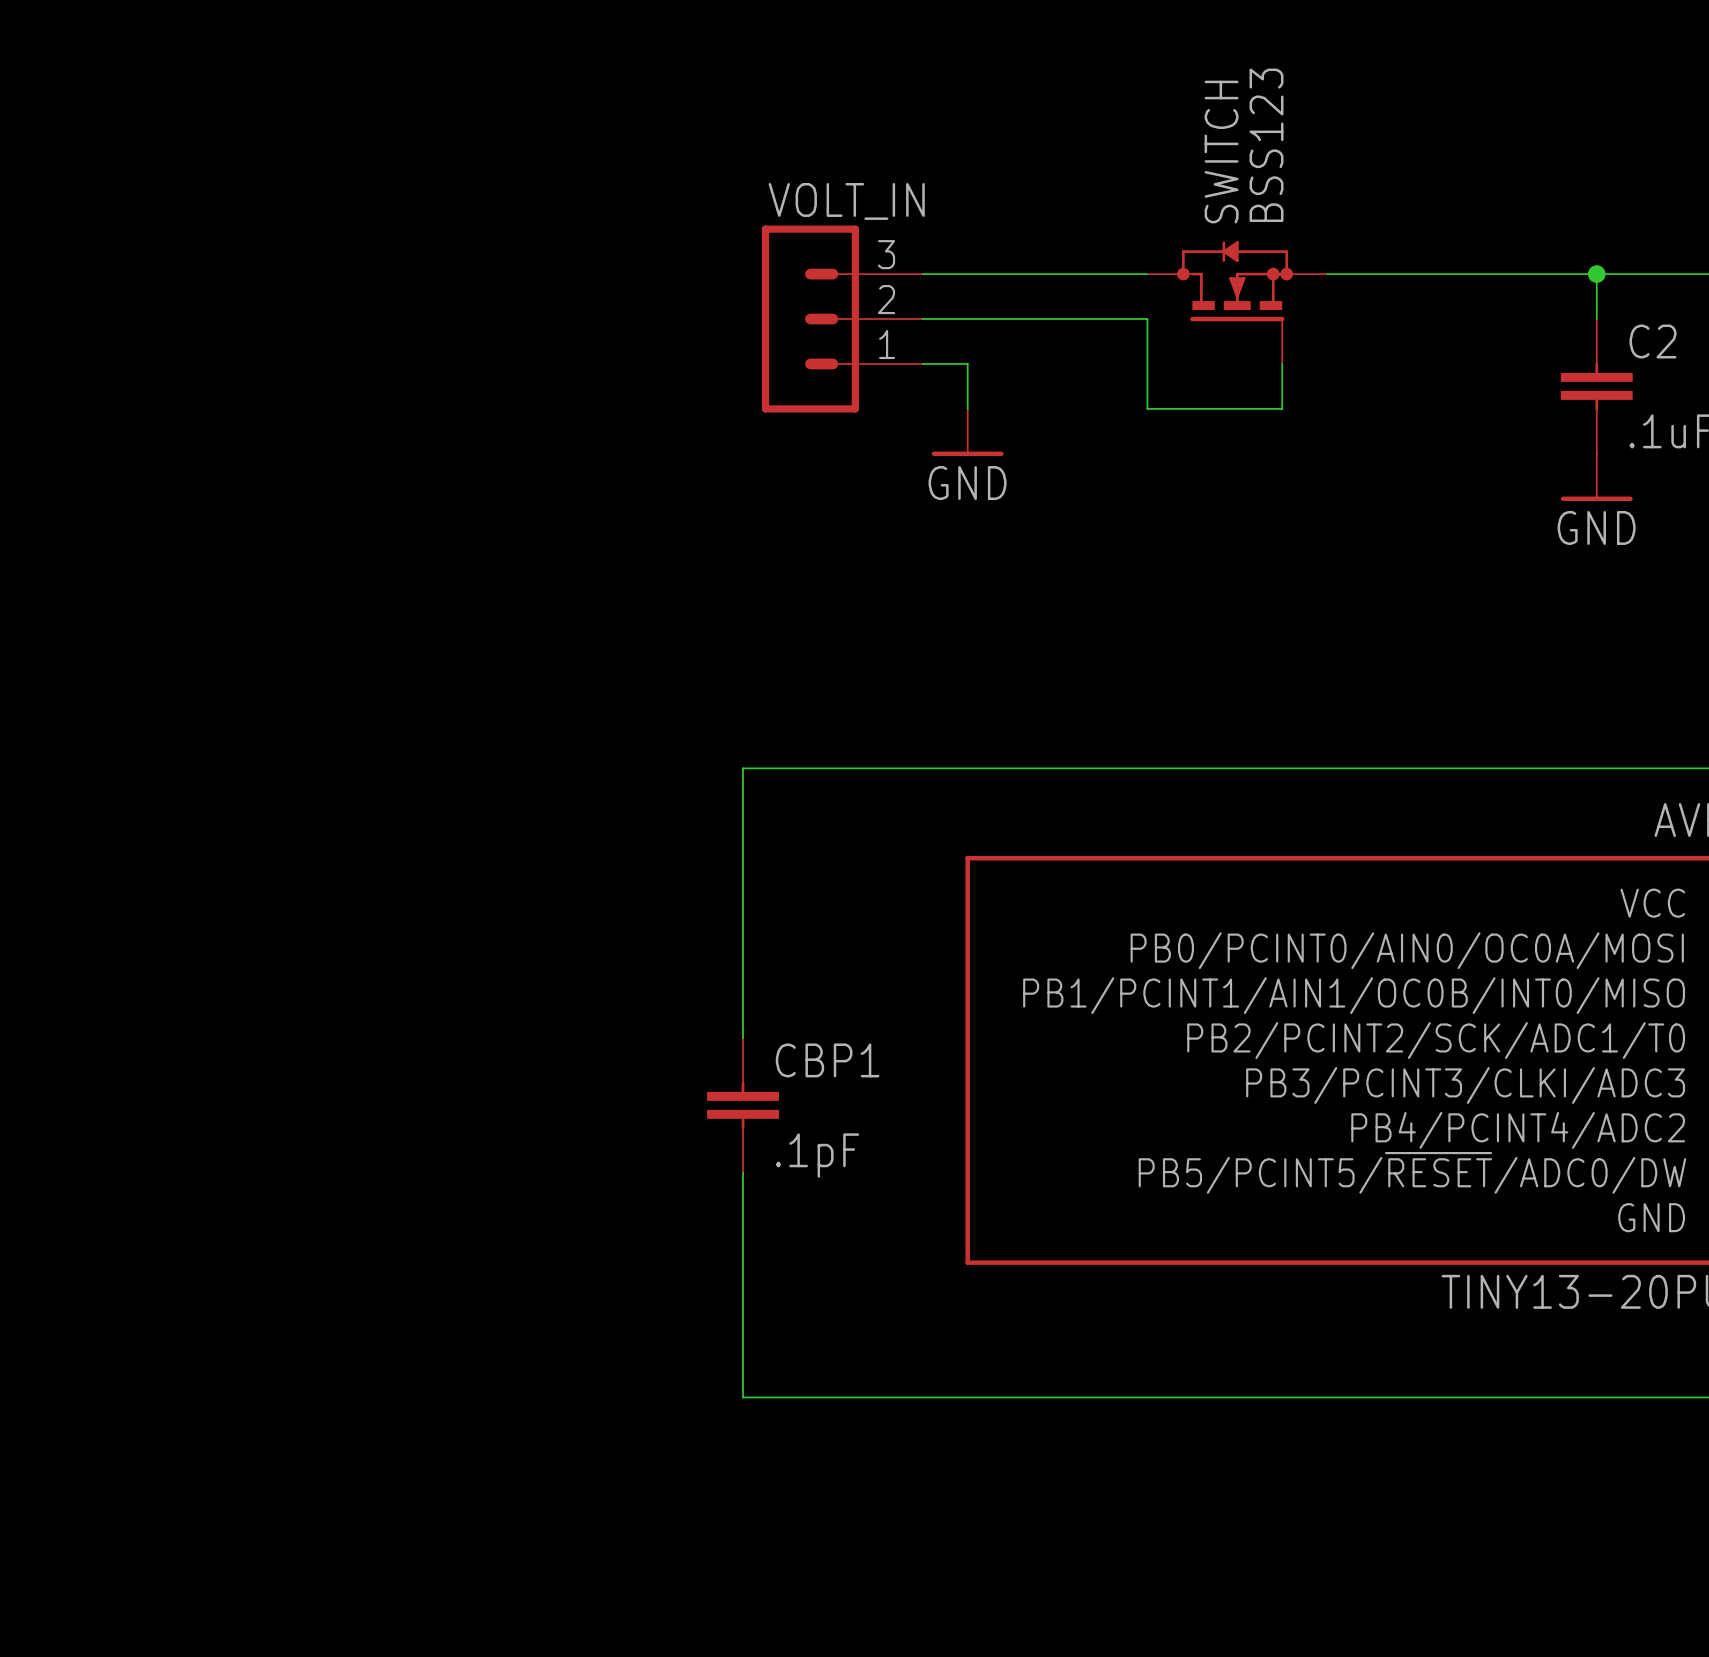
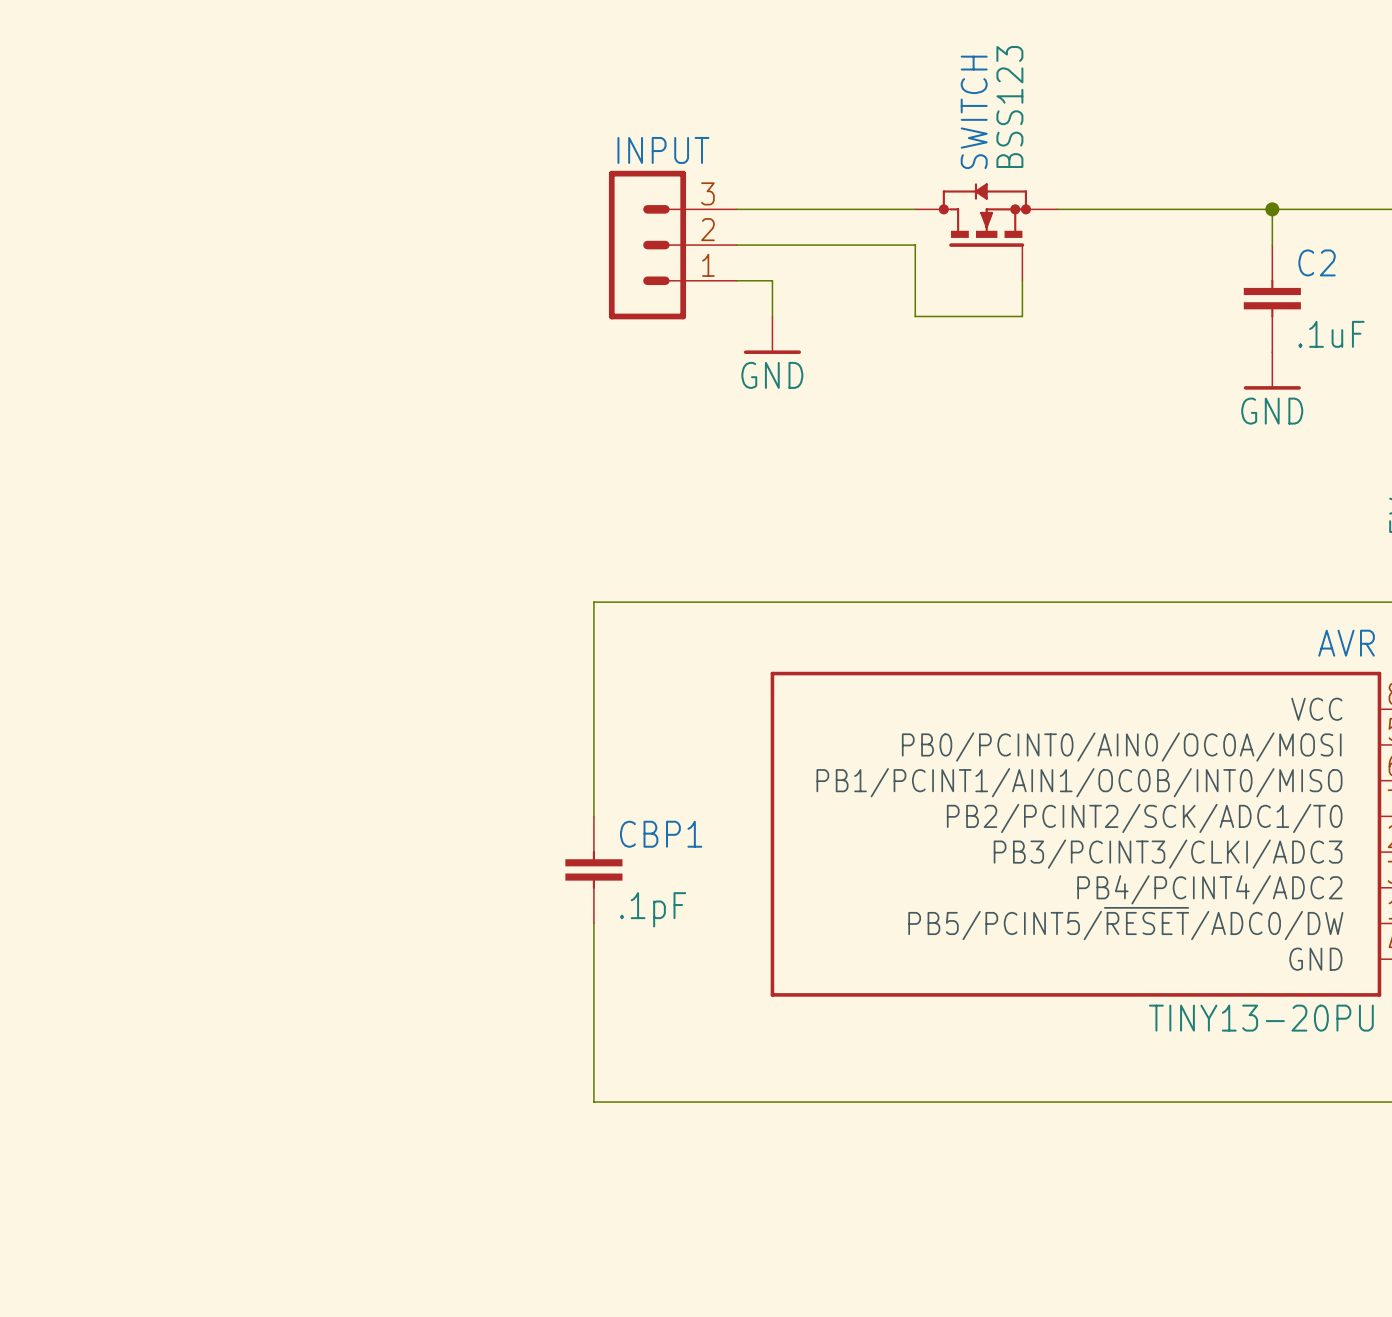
VOLT_IN name: VOLT_IN (846, 201) -> INPUT (663, 150)

